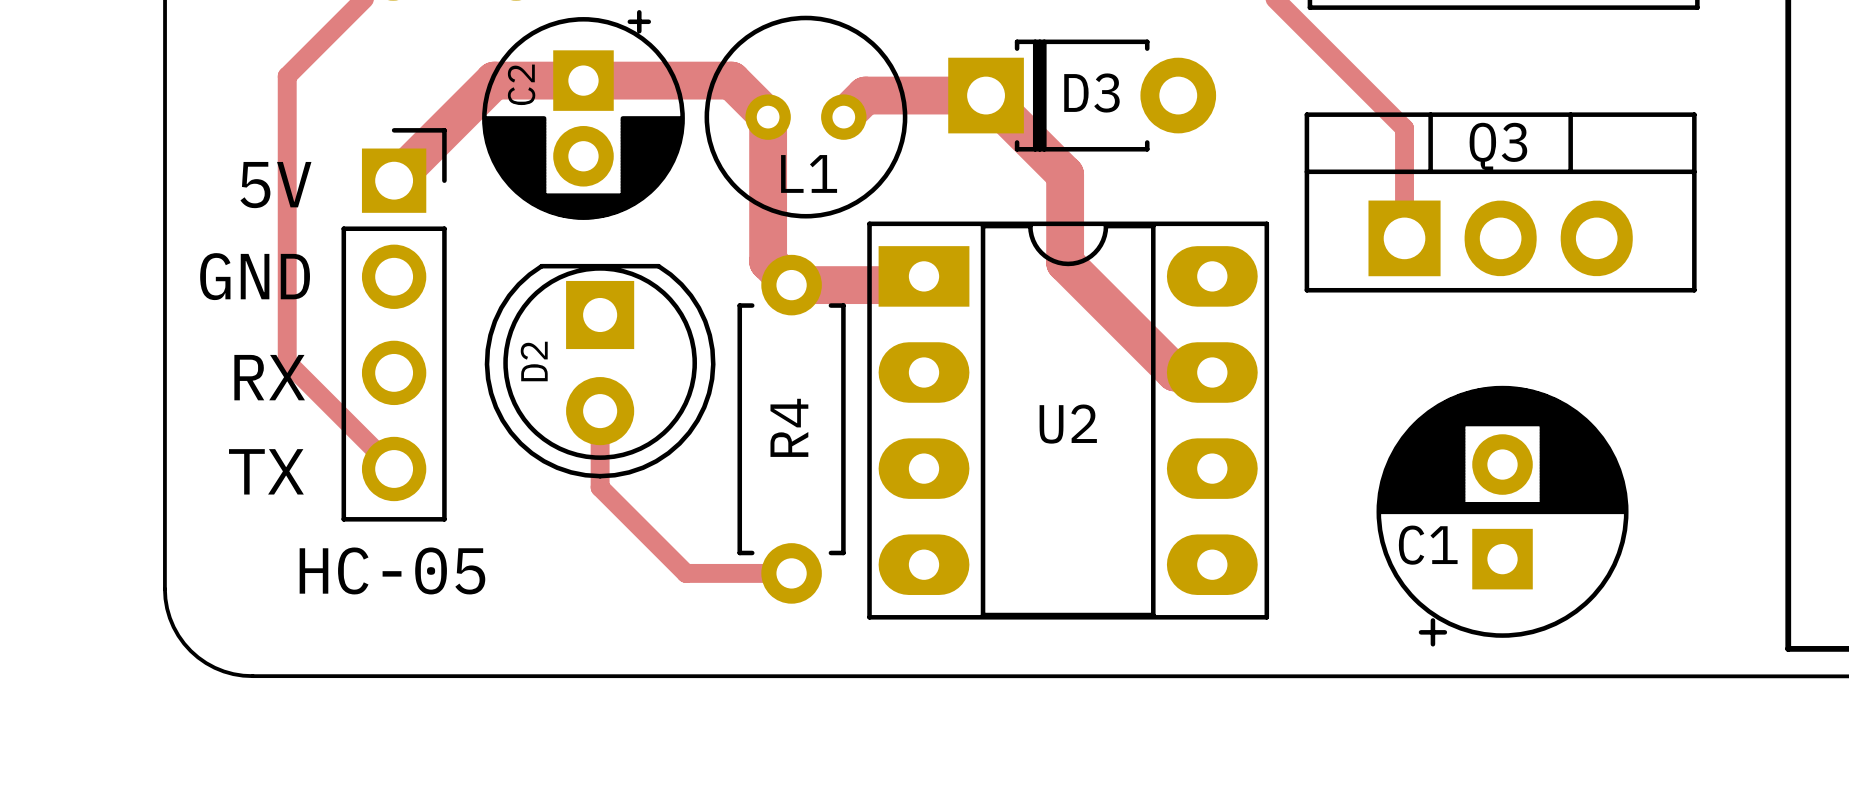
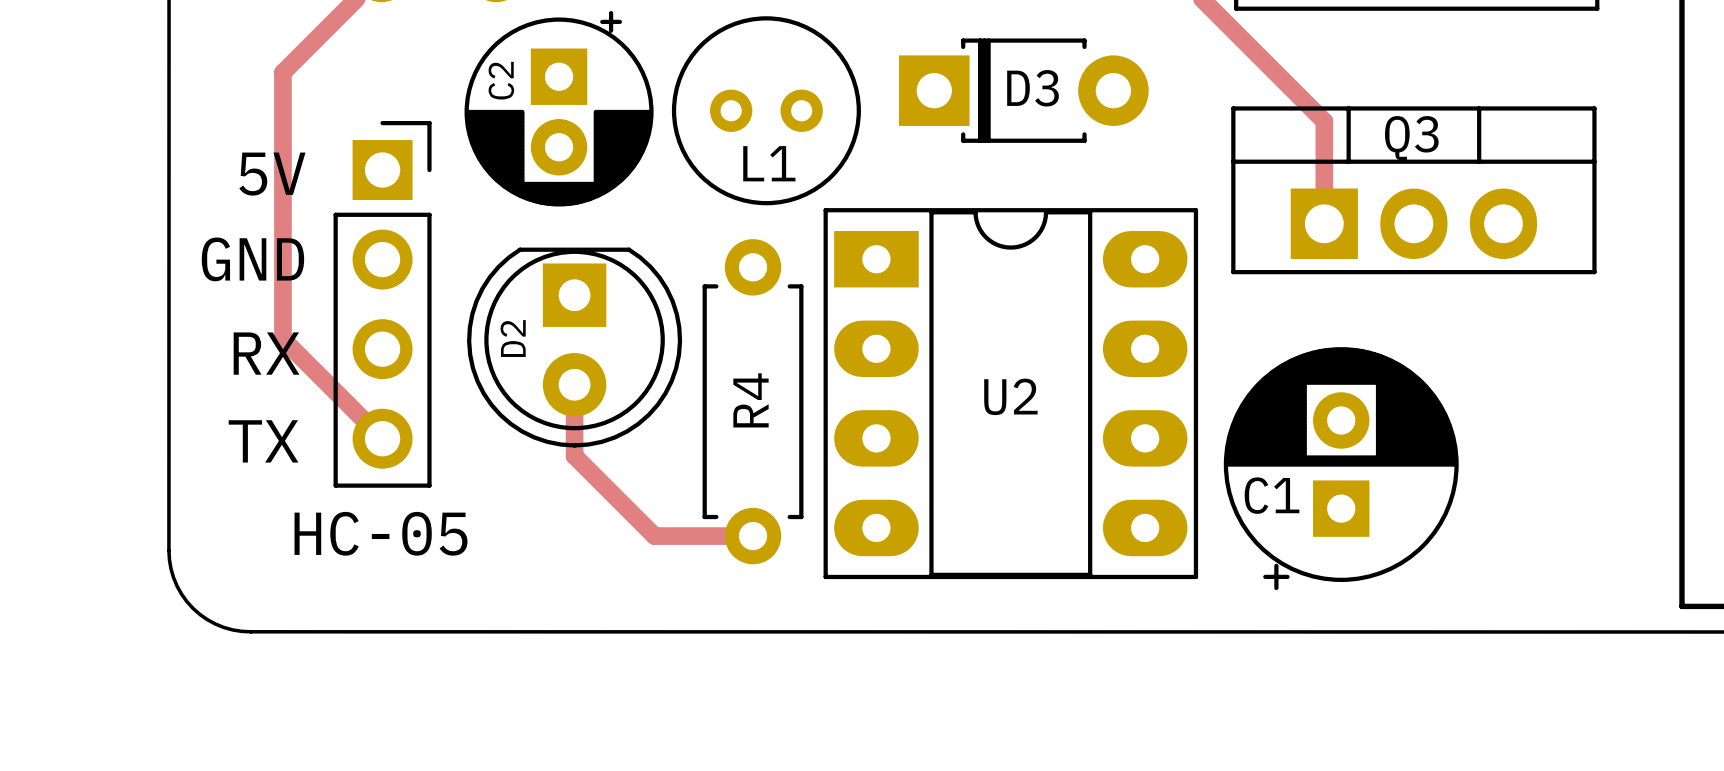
track: (843, 117) (865, 95) (986, 95) (1065, 174) (1065, 262) (1174, 372) (1212, 372) -> none
track: (394, 180) (494, 80) (731, 80) (768, 117) (768, 261) (791, 285) (915, 285) -> none
C1 position: (1502, 516) -> (1341, 468)

